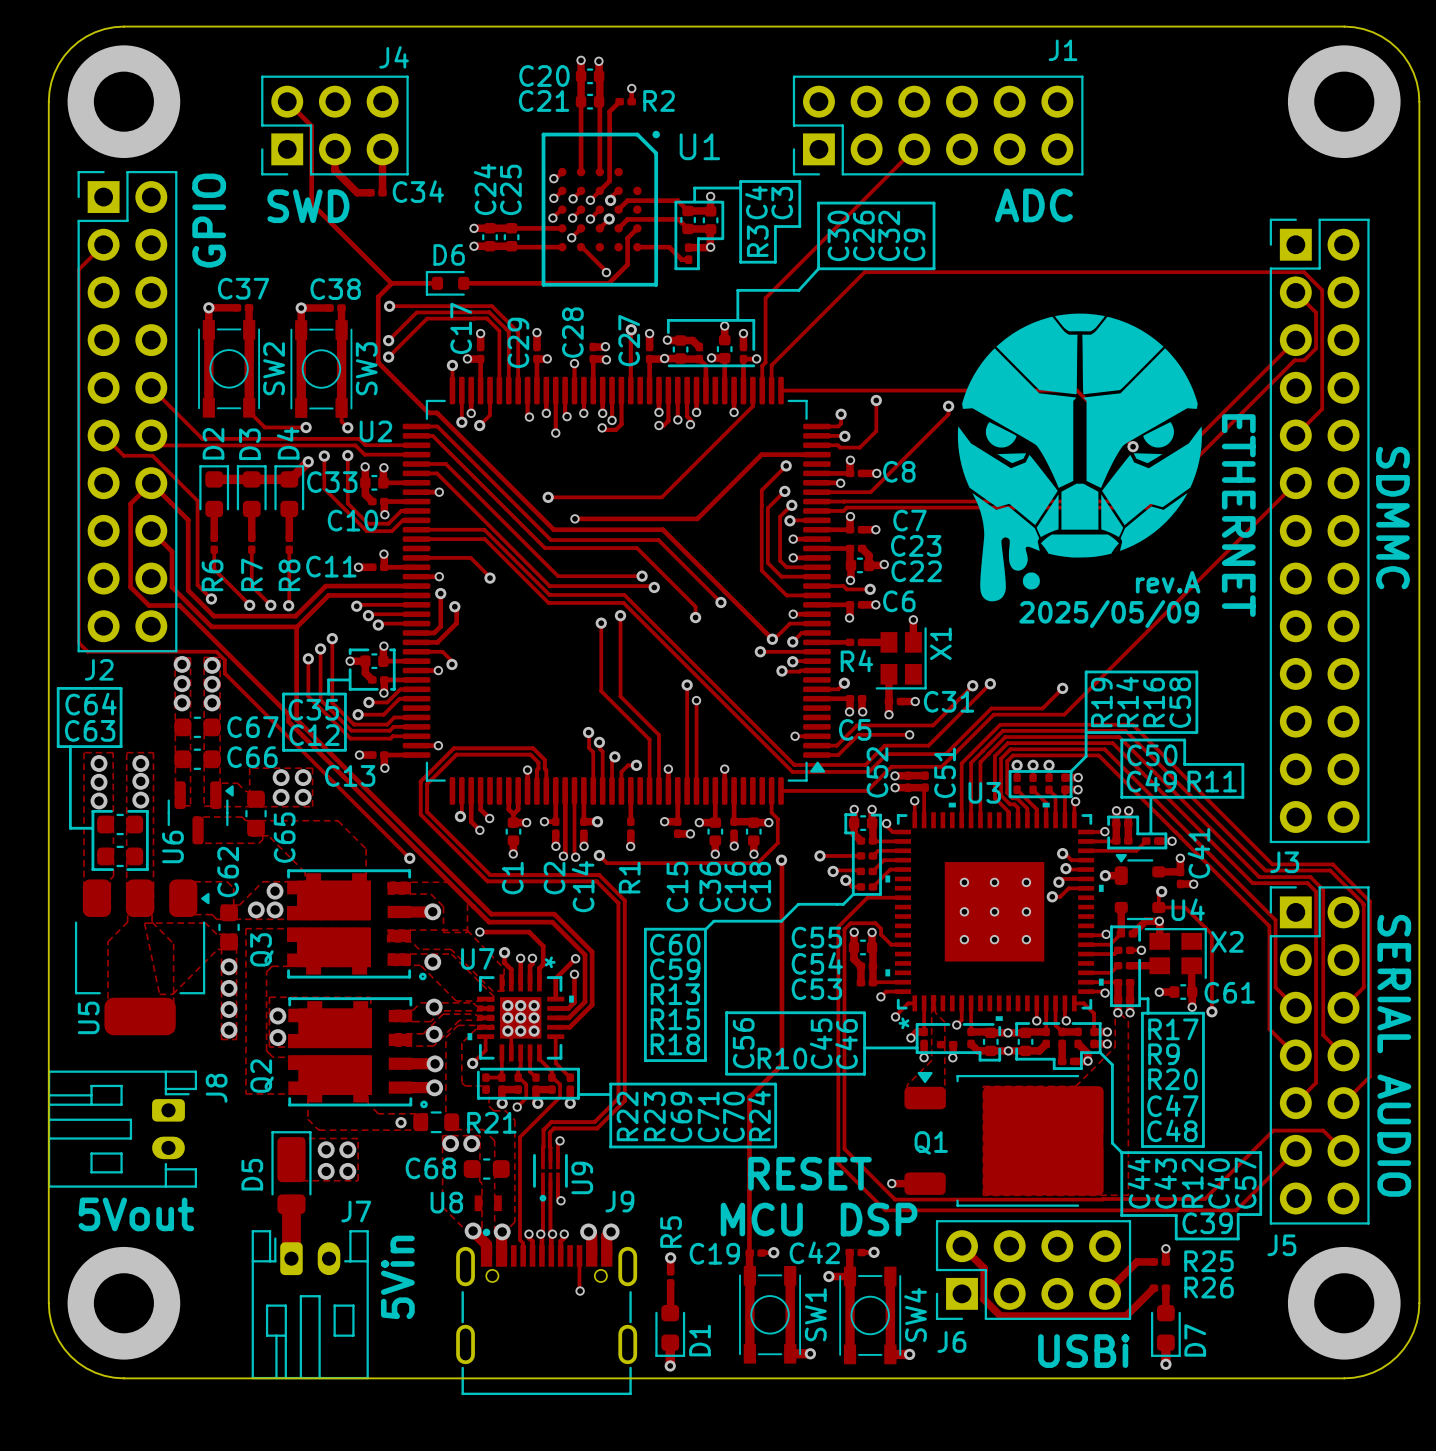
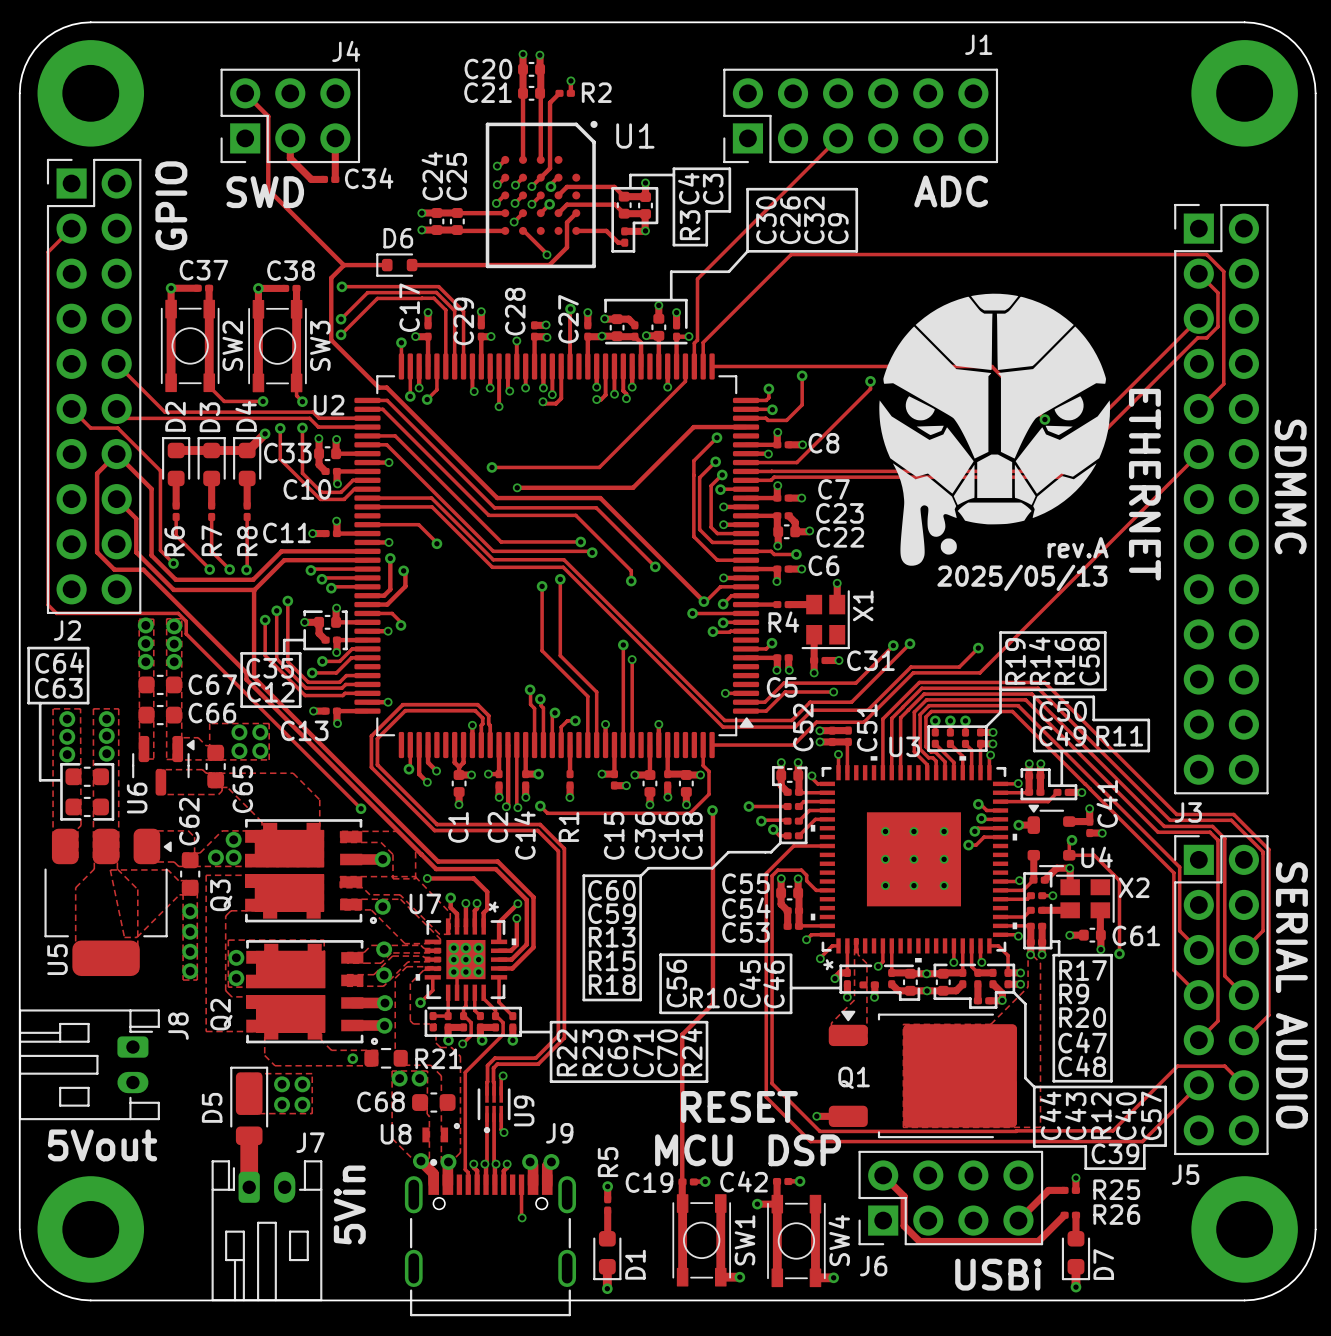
text: 2025/05/09 (1109, 614) -> 2025/05/13 (1022, 577)
drawing: none -> [453, 1122, 461, 1130]

